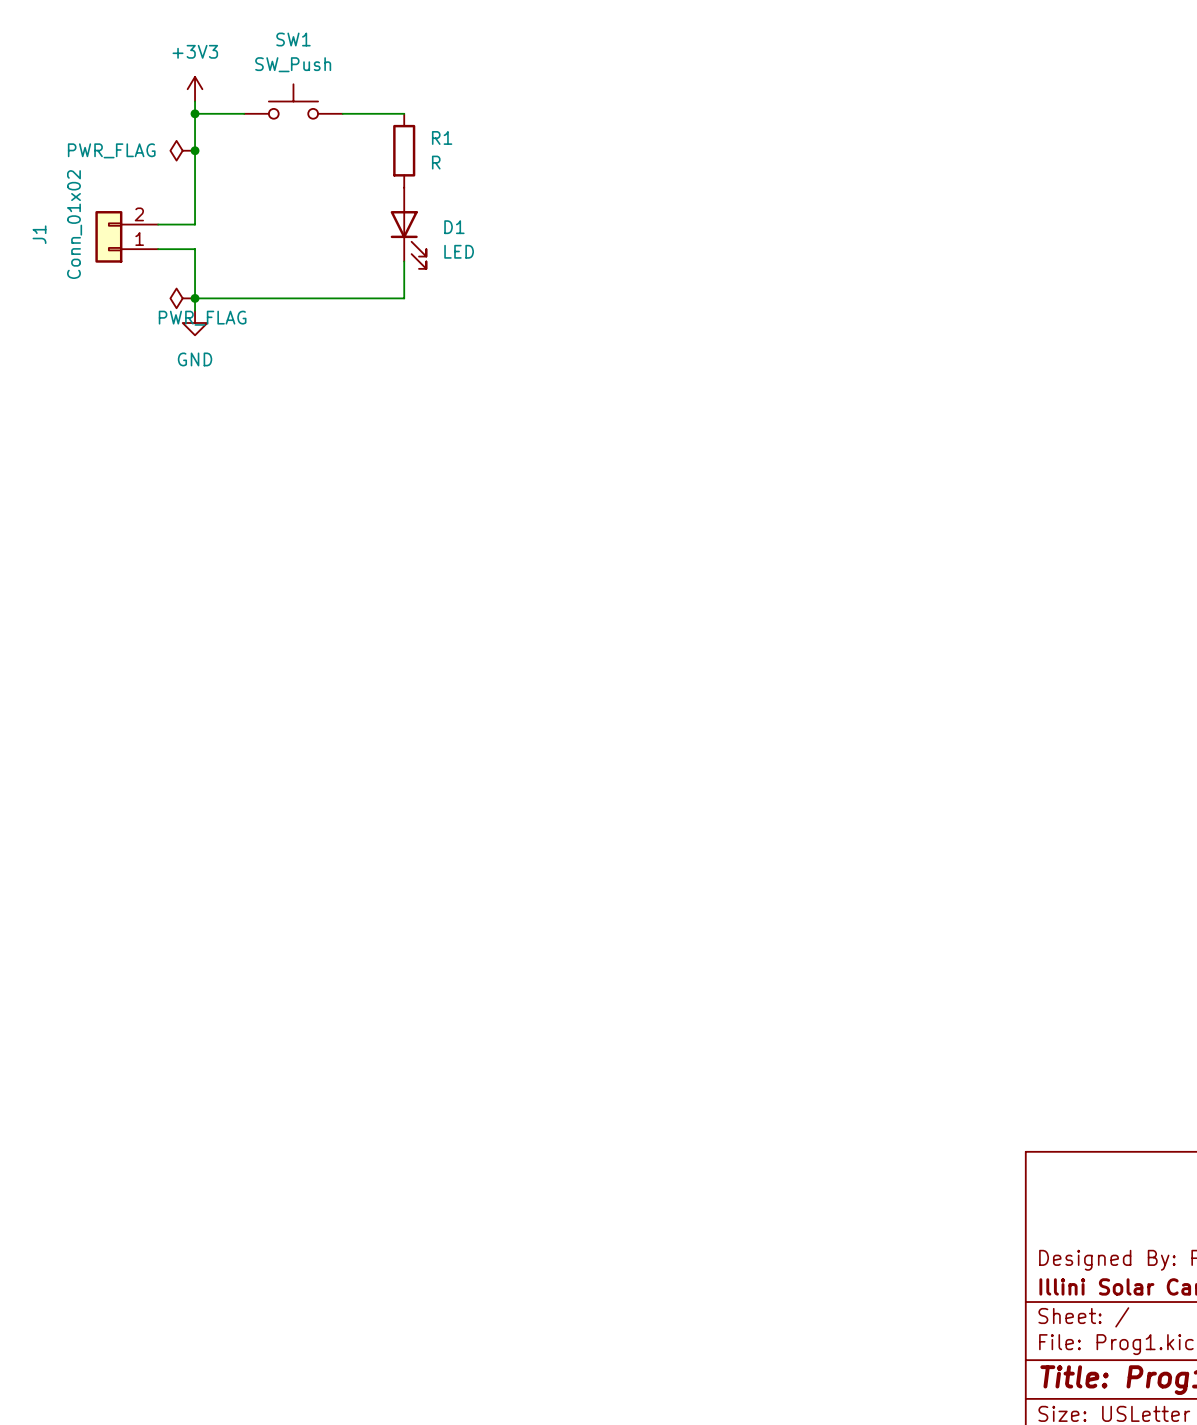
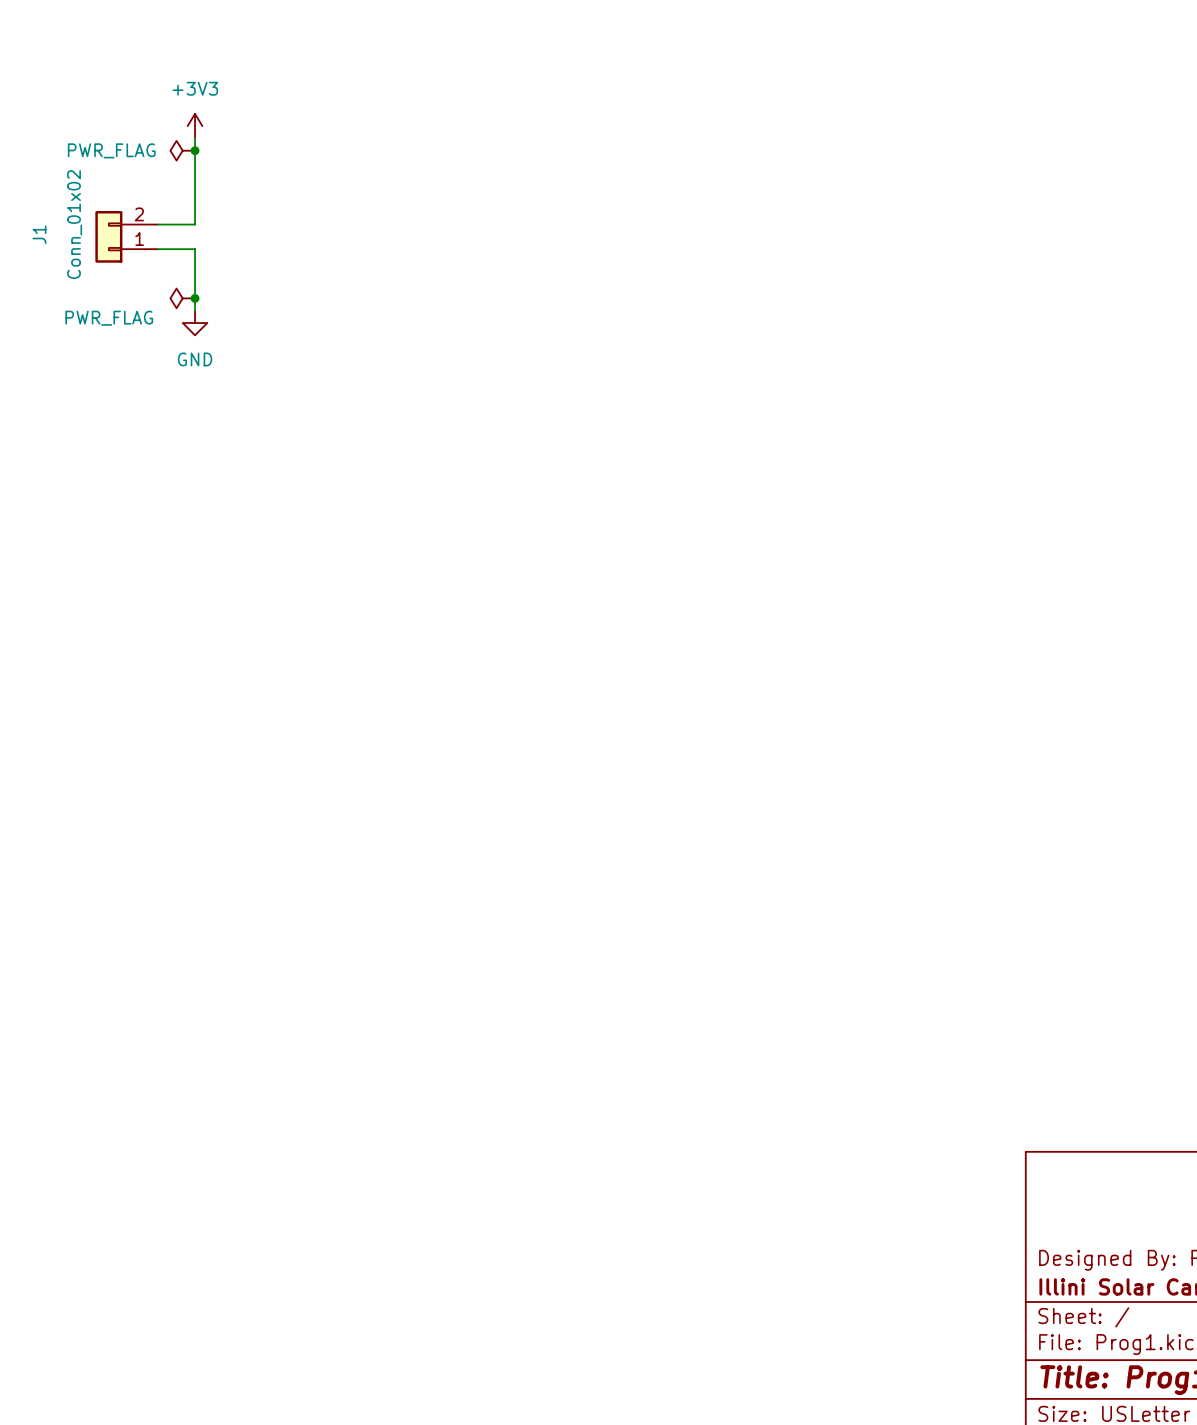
power symbol position: +3V3 (195, 89) -> +3V3 (195, 126)
SW1: SW_Push (293, 101) -> none
wire: (195, 113) (244, 113) -> none
junction: (195, 113) -> none
wire: (342, 113) (404, 113) -> none
R1: R (404, 150) -> none
D1: LED (408, 228) -> none
wire: (404, 261) (404, 298) (195, 298) -> none
power symbol text position: PWR_FLAG (202, 318) -> PWR_FLAG (109, 318)

